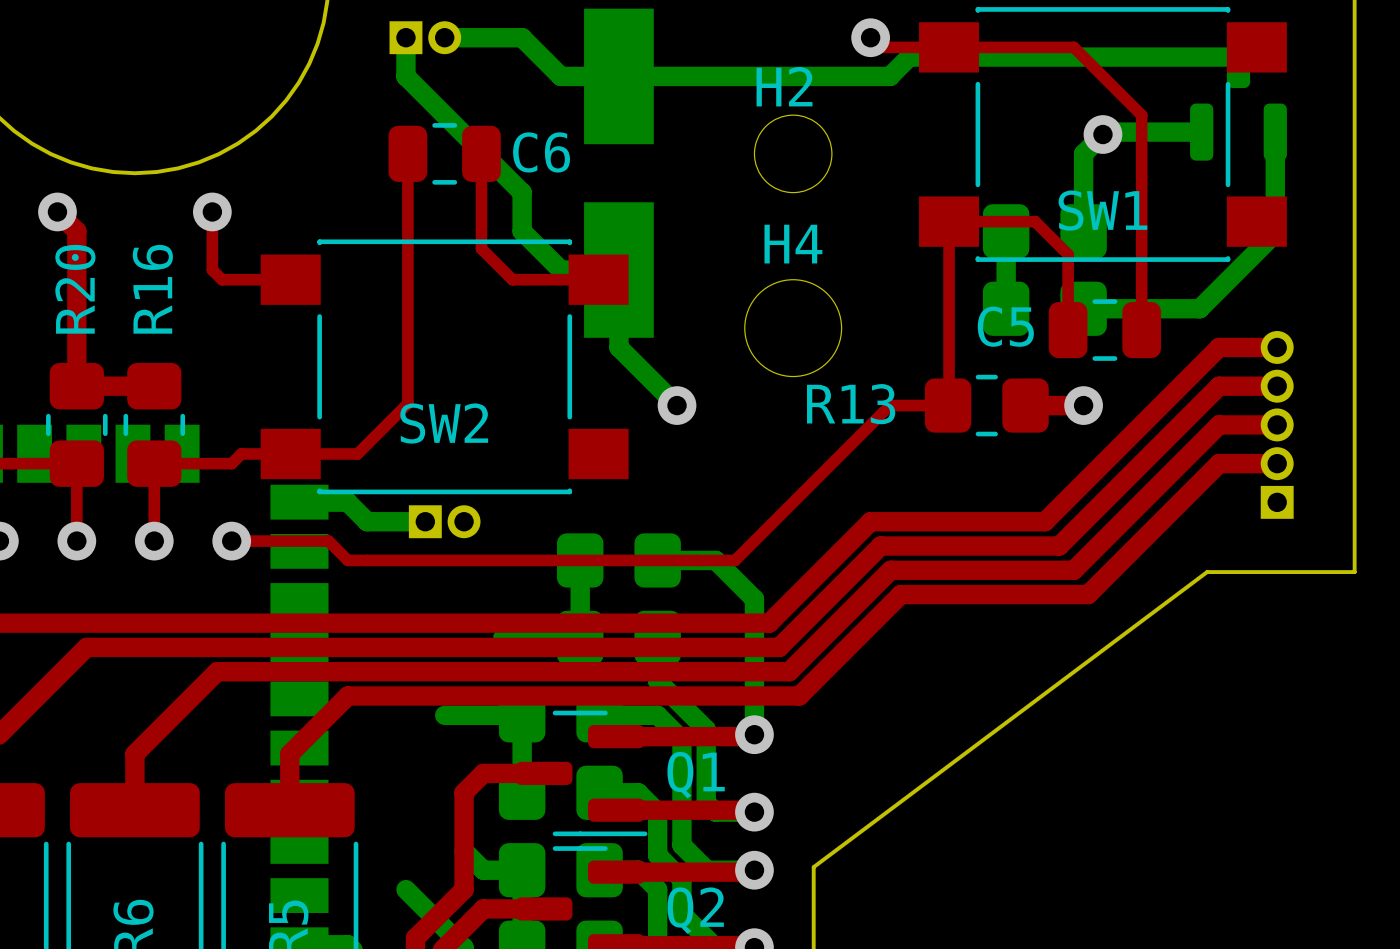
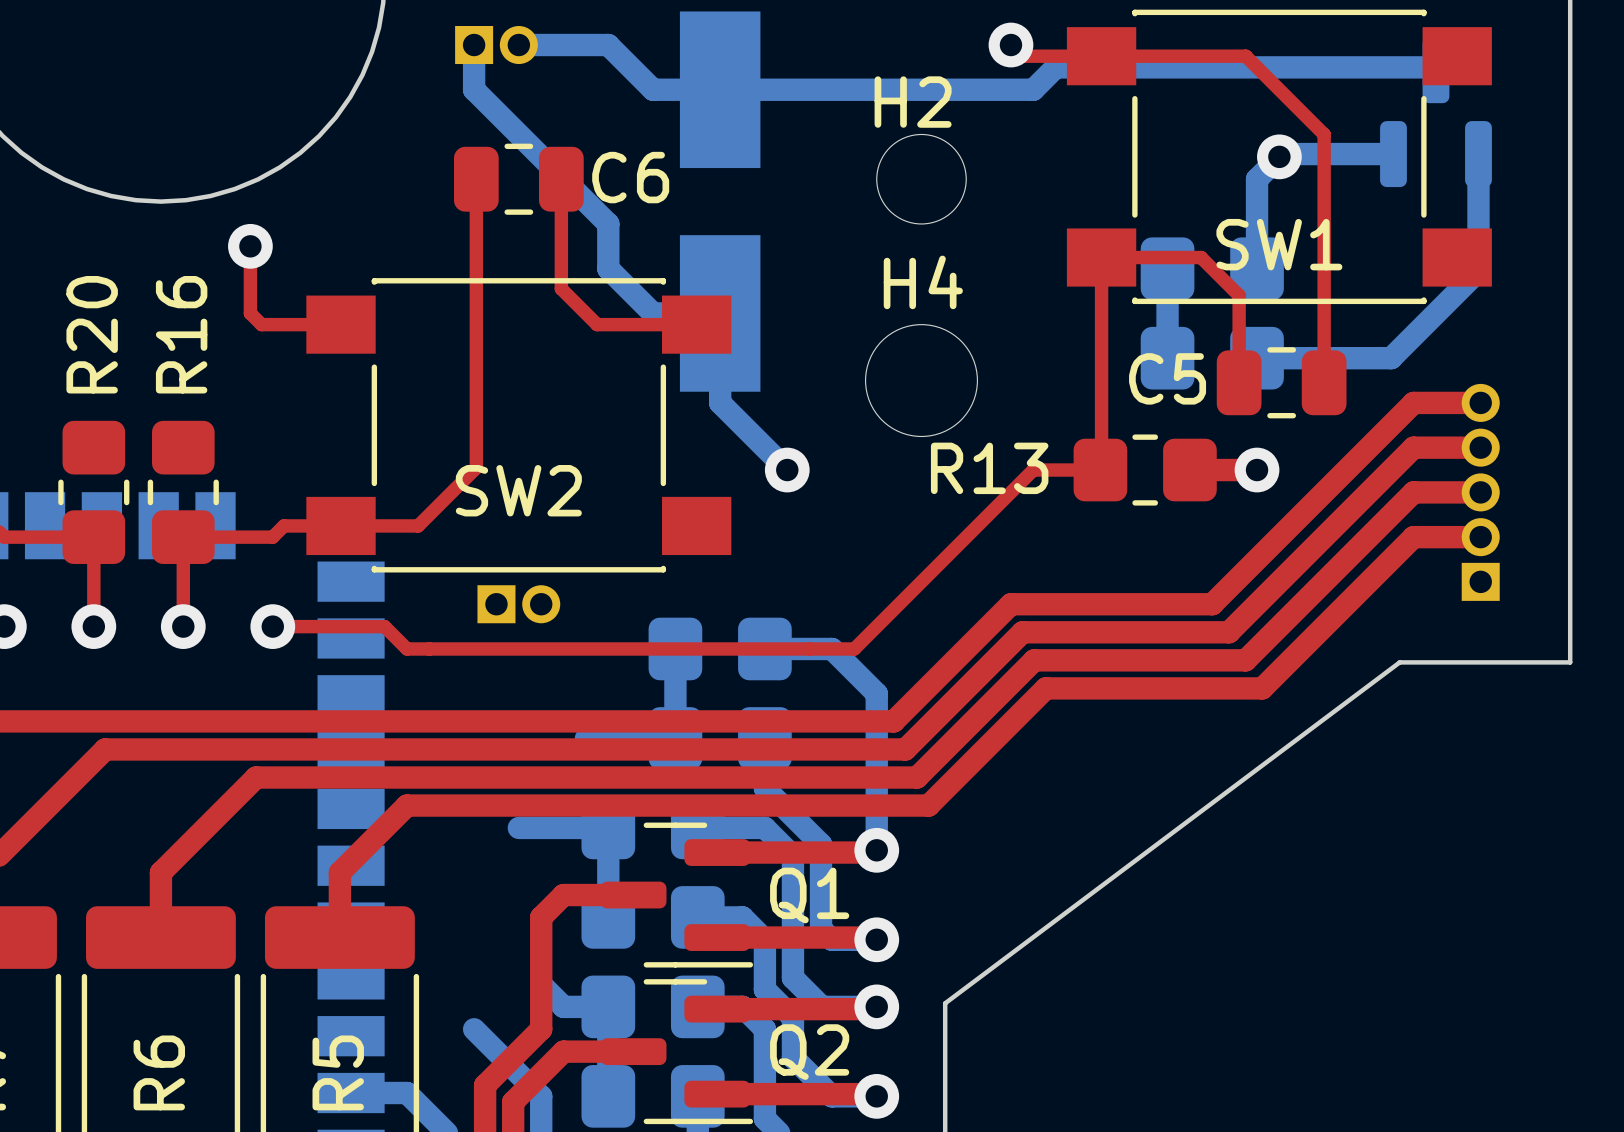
top track: (57, 211) (76, 231) (76, 386) (154, 386) -> none
via: (57, 211) -> none
bottom track: (299, 502) (347, 502) (367, 521) (425, 521) -> none

